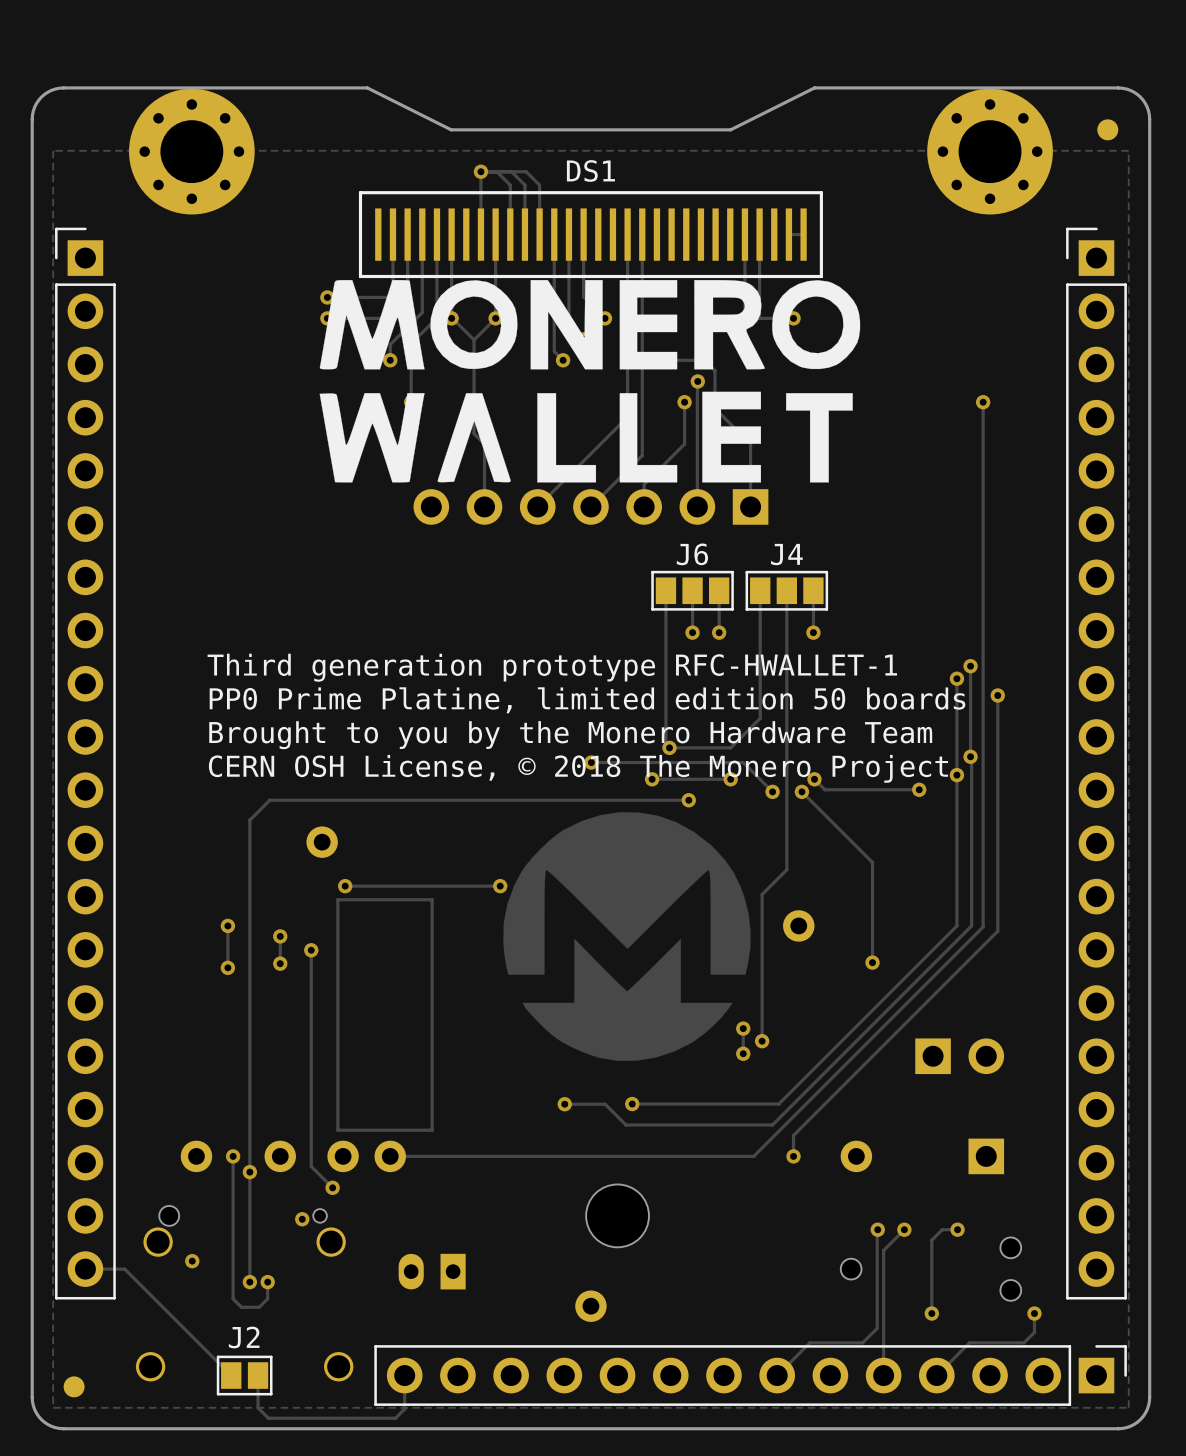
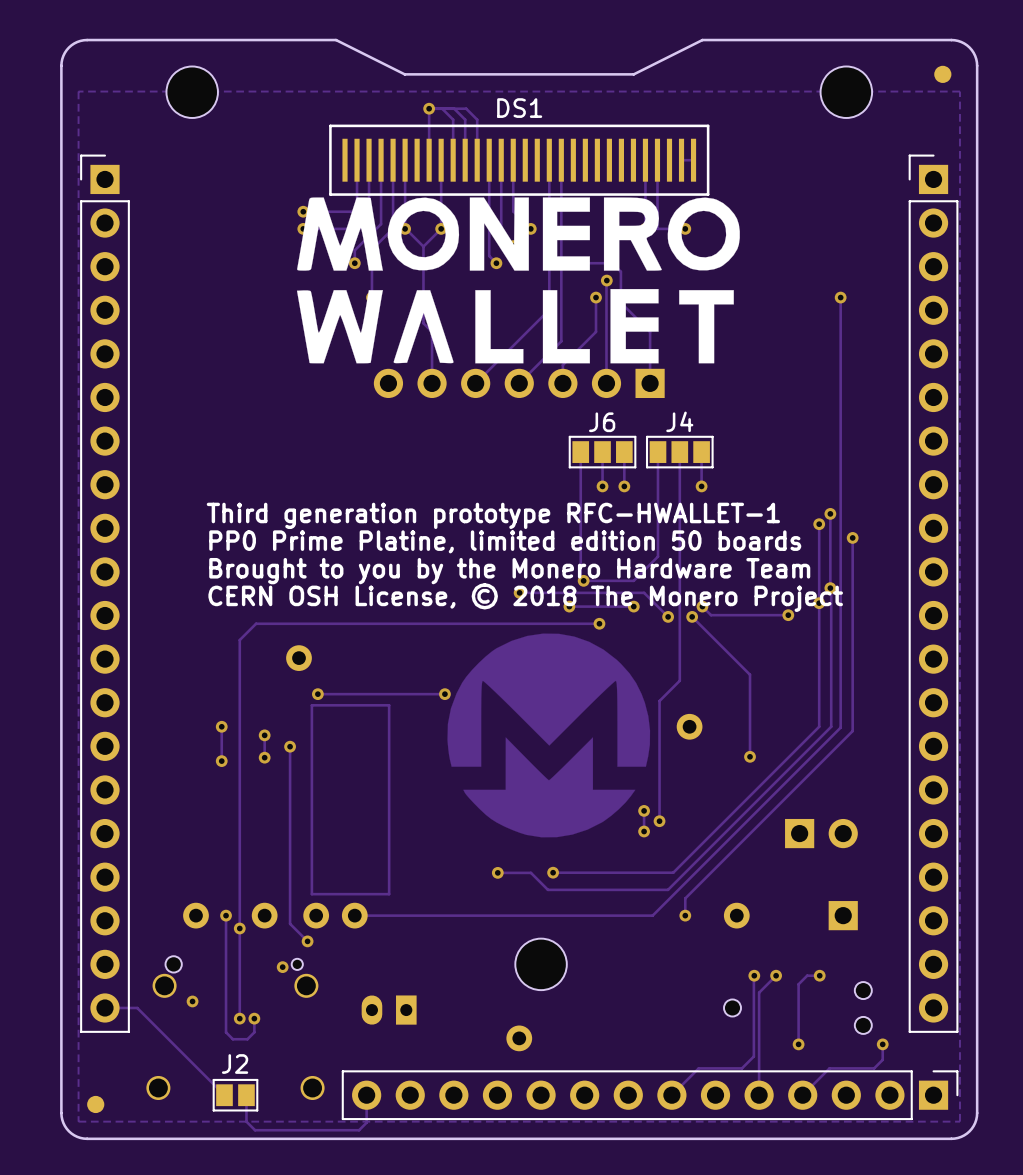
part footprint: [128, 88, 255, 215] -> [166, 66, 218, 118]
part footprint: [927, 88, 1053, 215] -> [820, 66, 873, 118]

